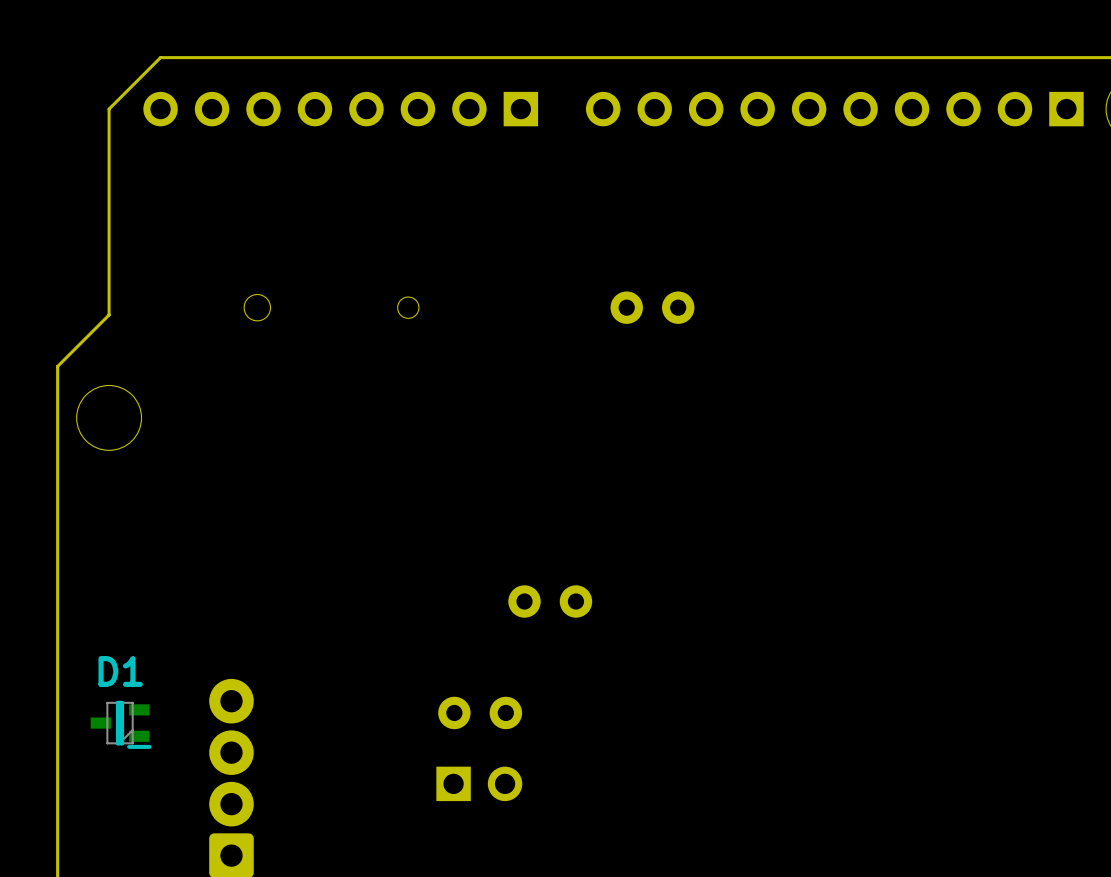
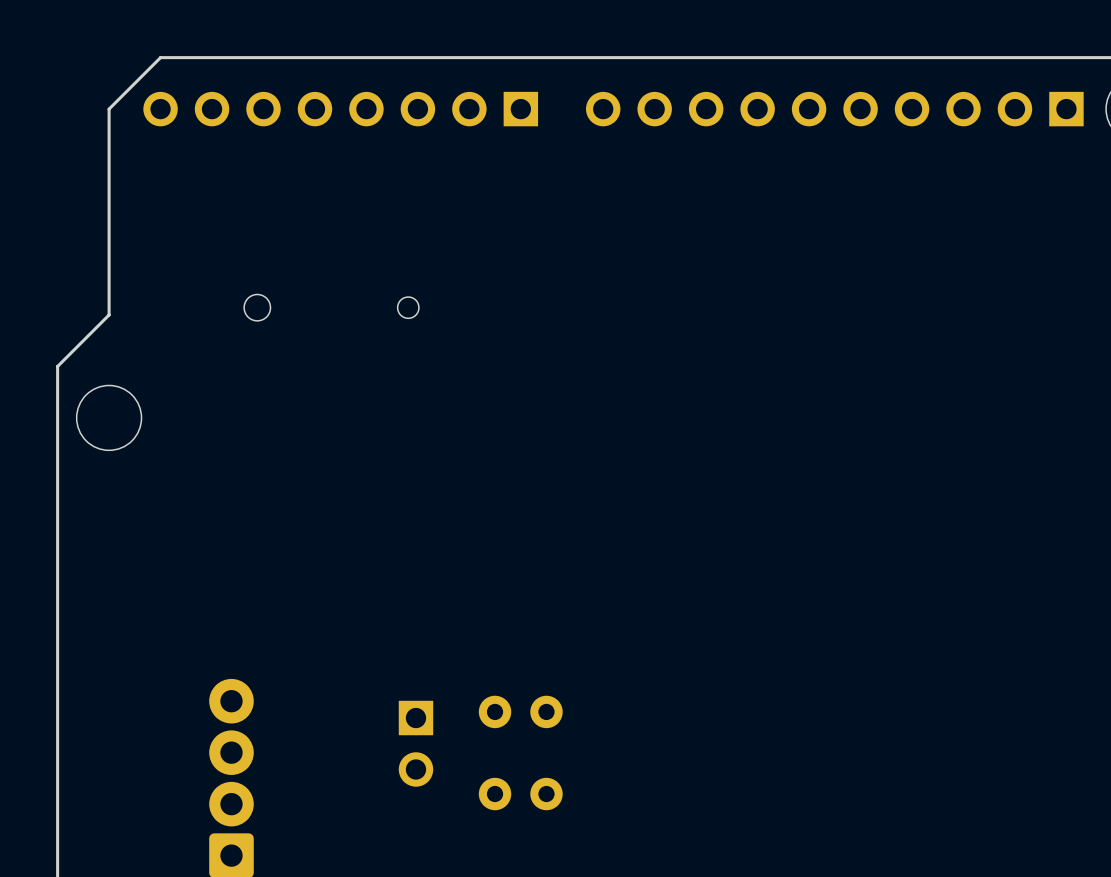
part: (652, 307) -> none
part: (550, 601) -> none
part position: (480, 712) -> (520, 711)
D1: (121, 724) -> none
part rotation: 0° (479, 783) -> 90° clockwise (415, 743)
part position: (479, 783) -> (415, 743)
part: none -> (520, 794)

